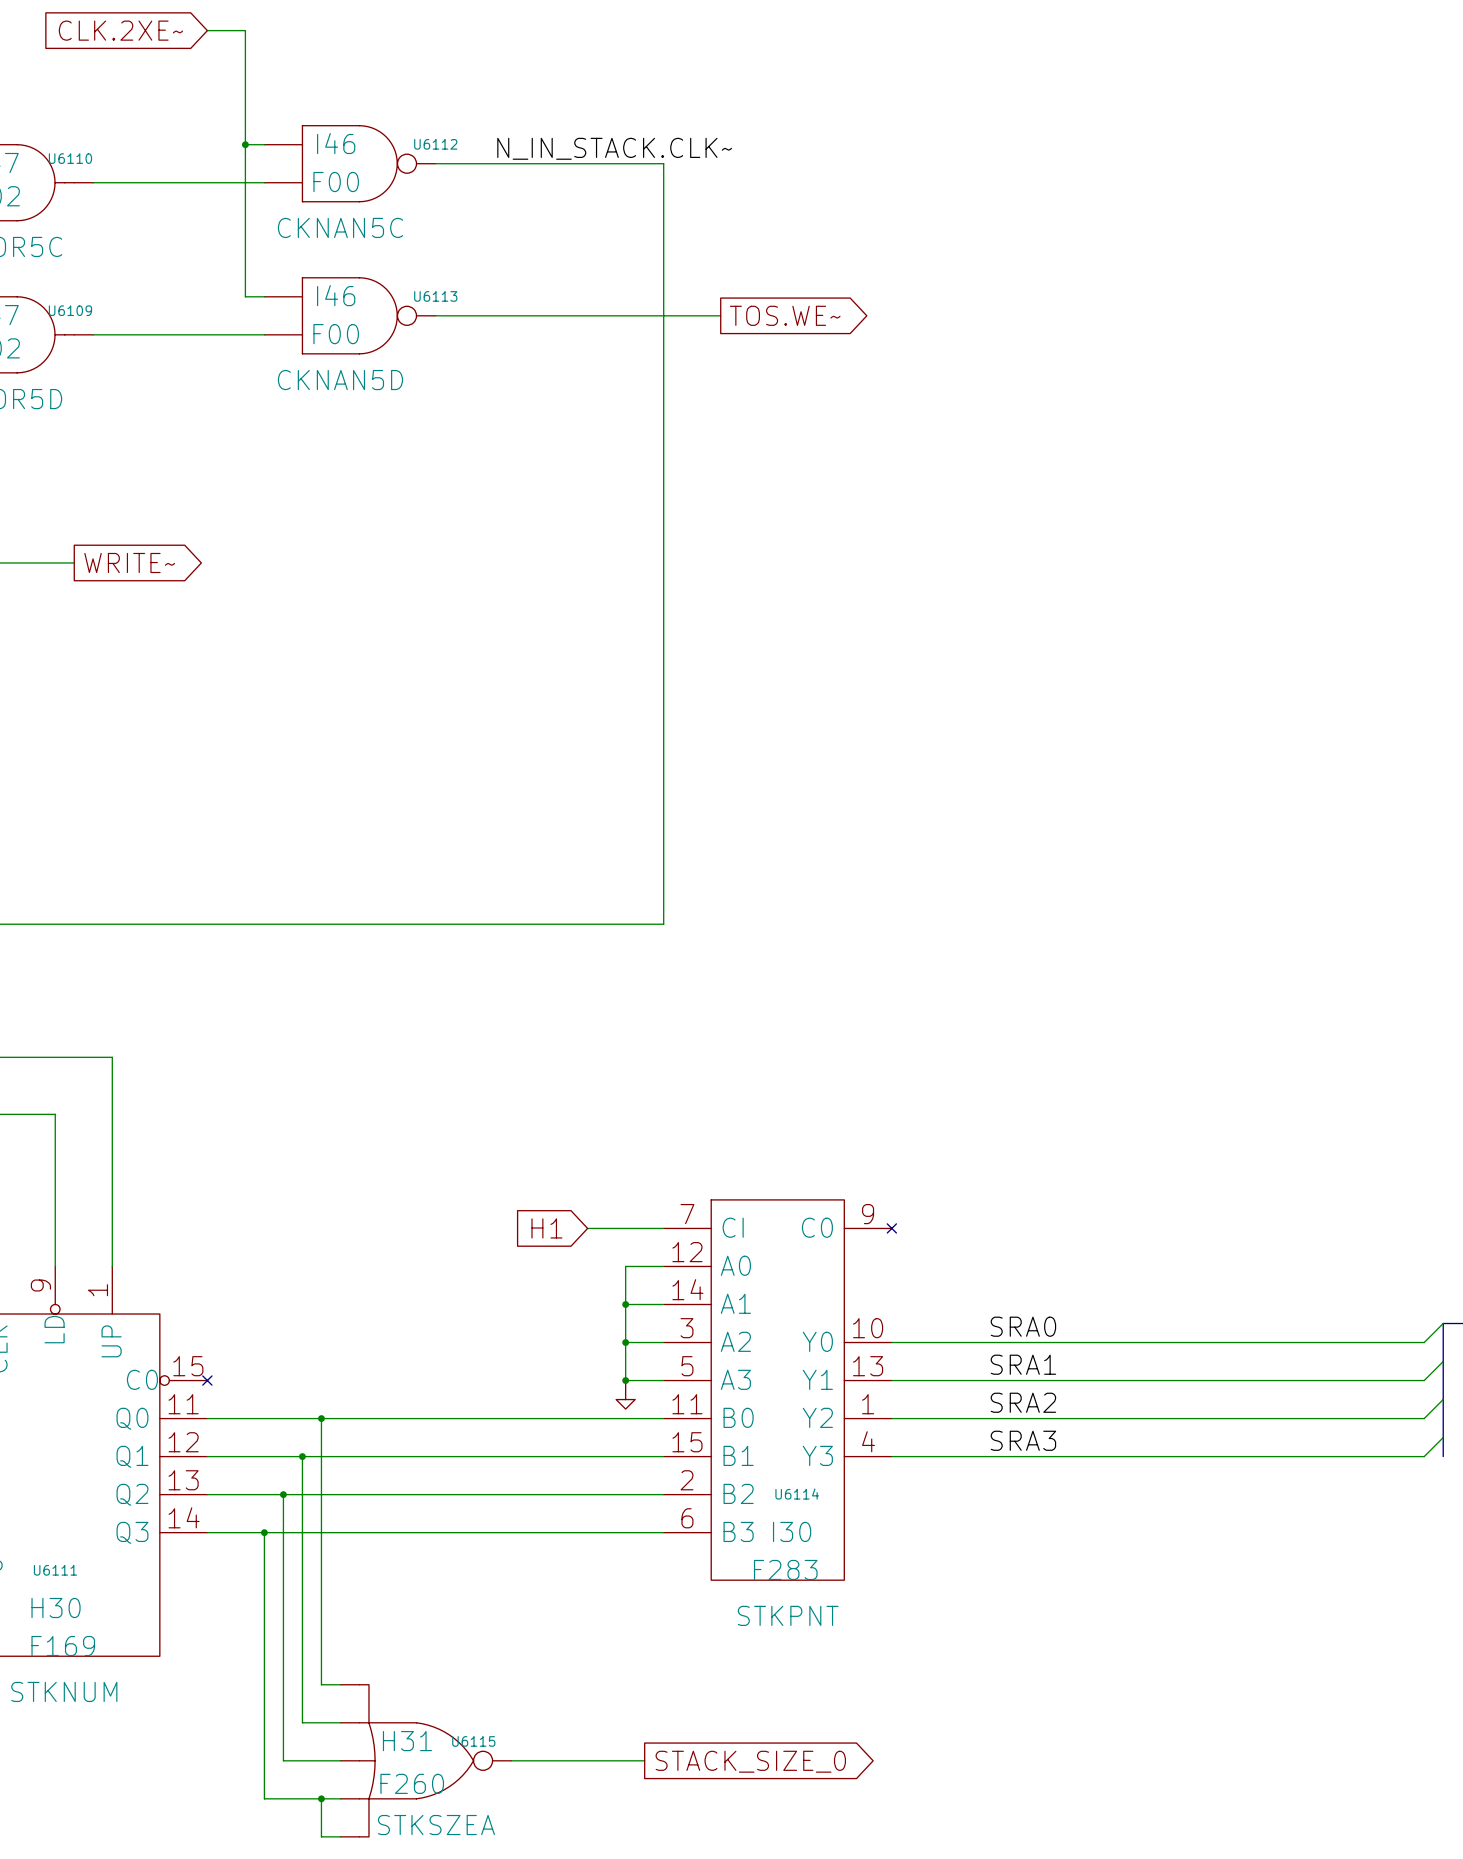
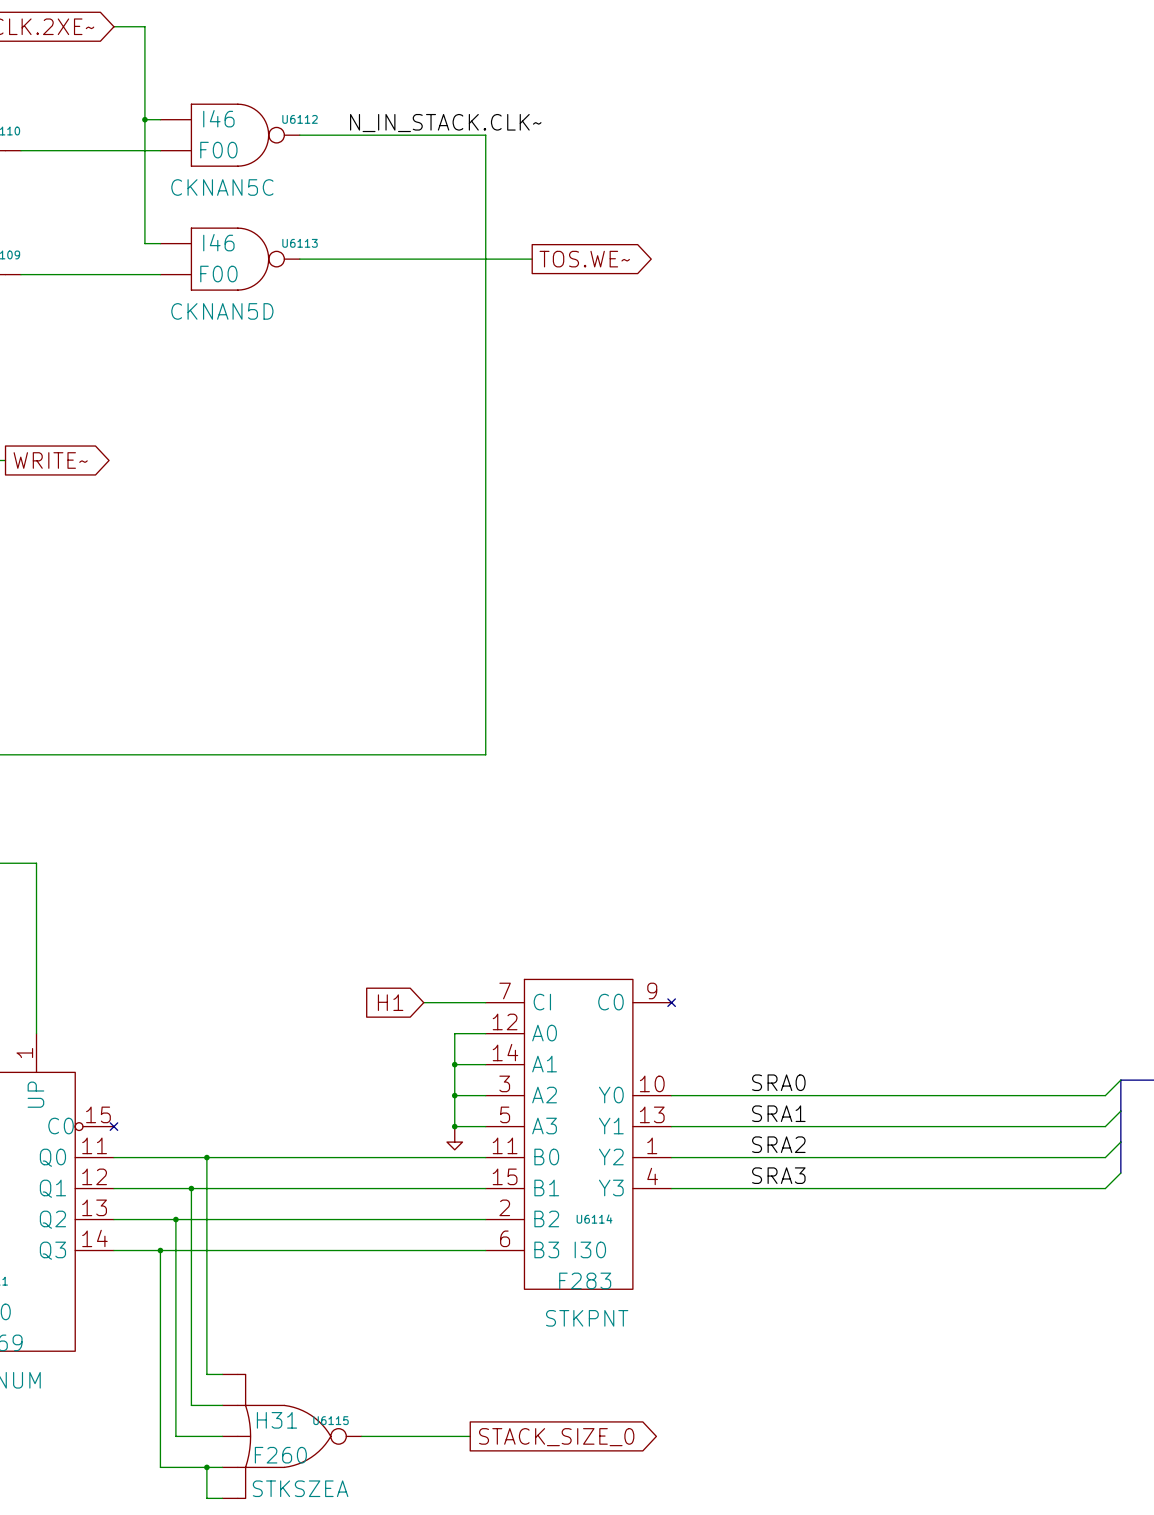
bus: (1443, 1437) (1443, 1456) -> none

